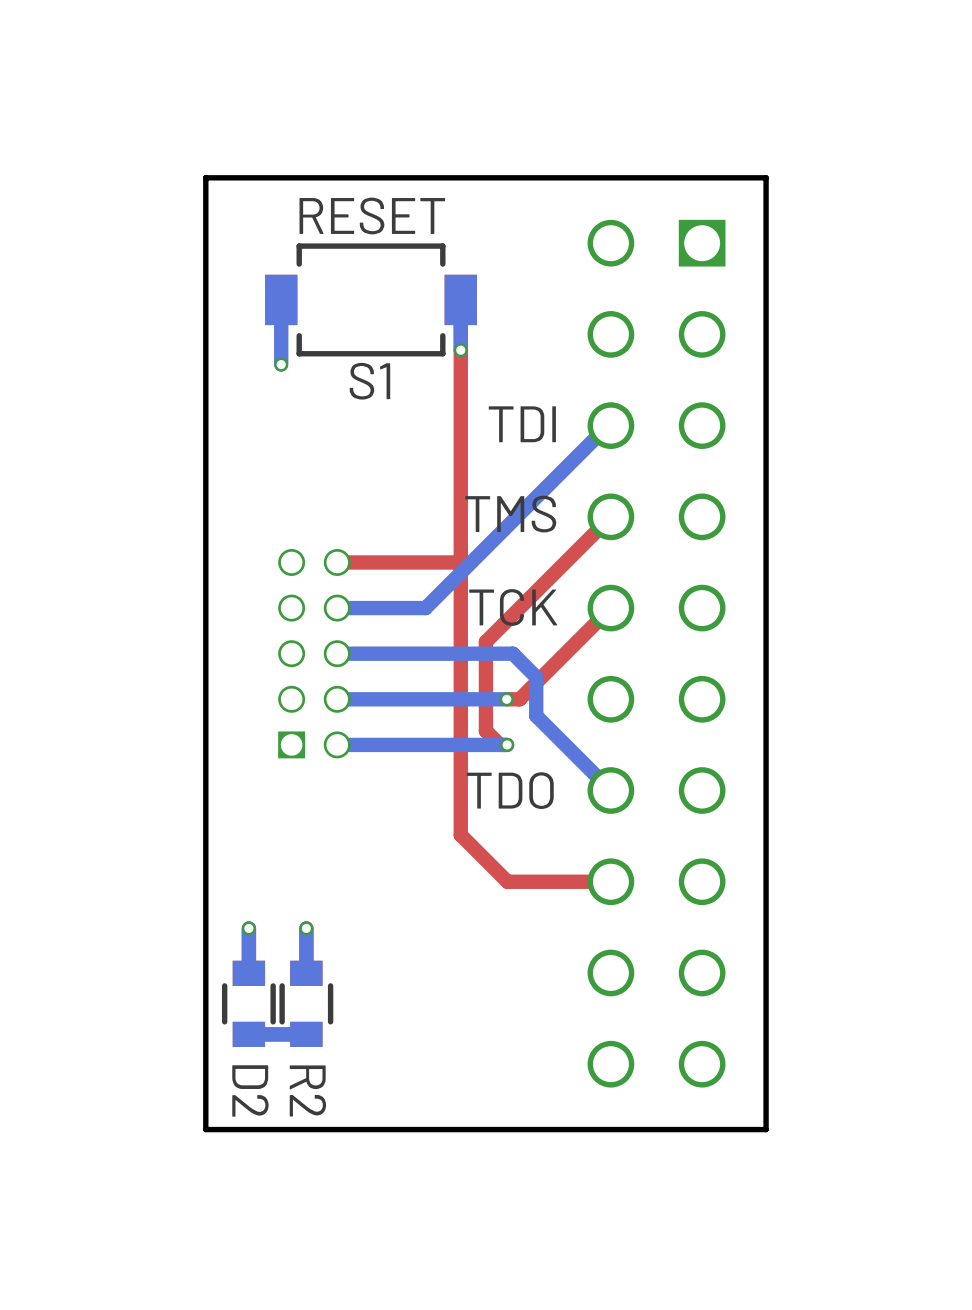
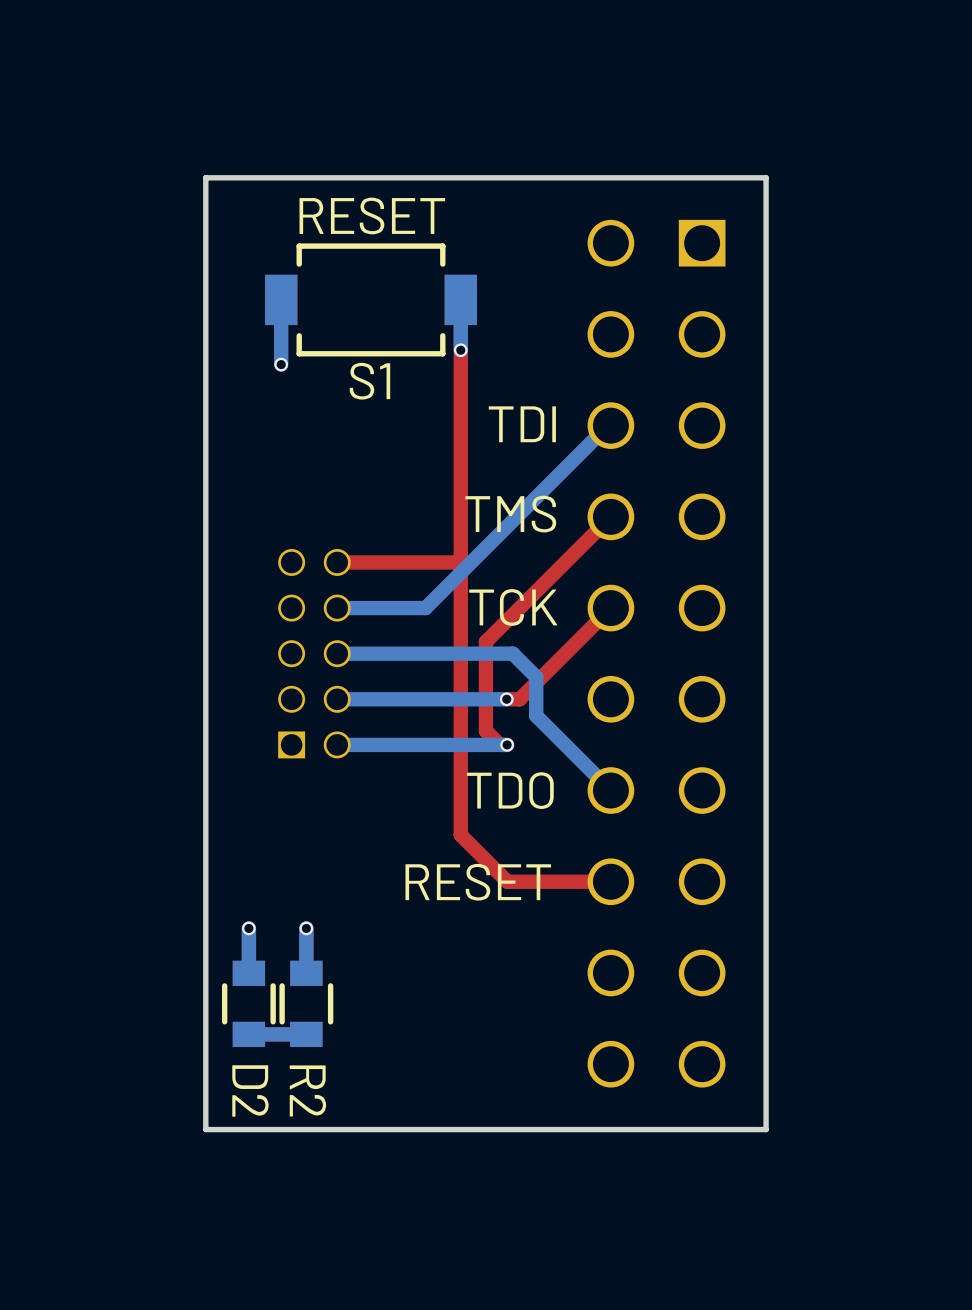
text: none -> RESET (478, 882)

